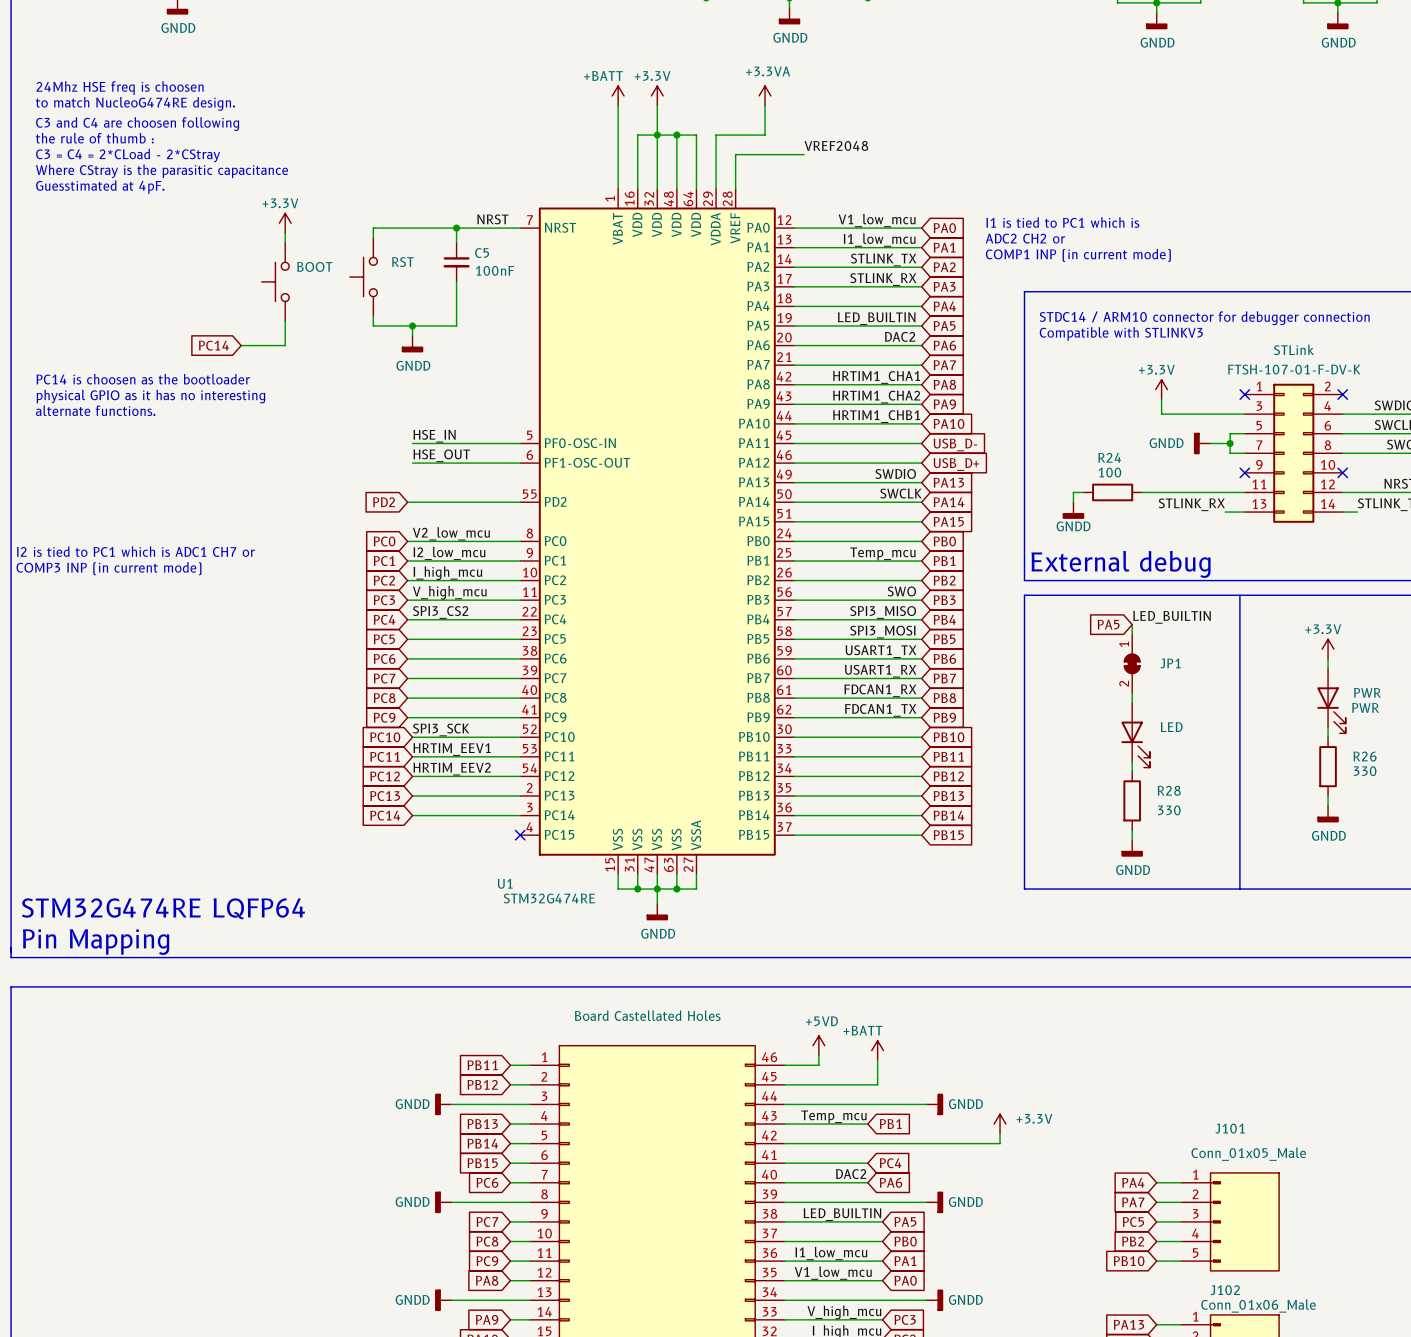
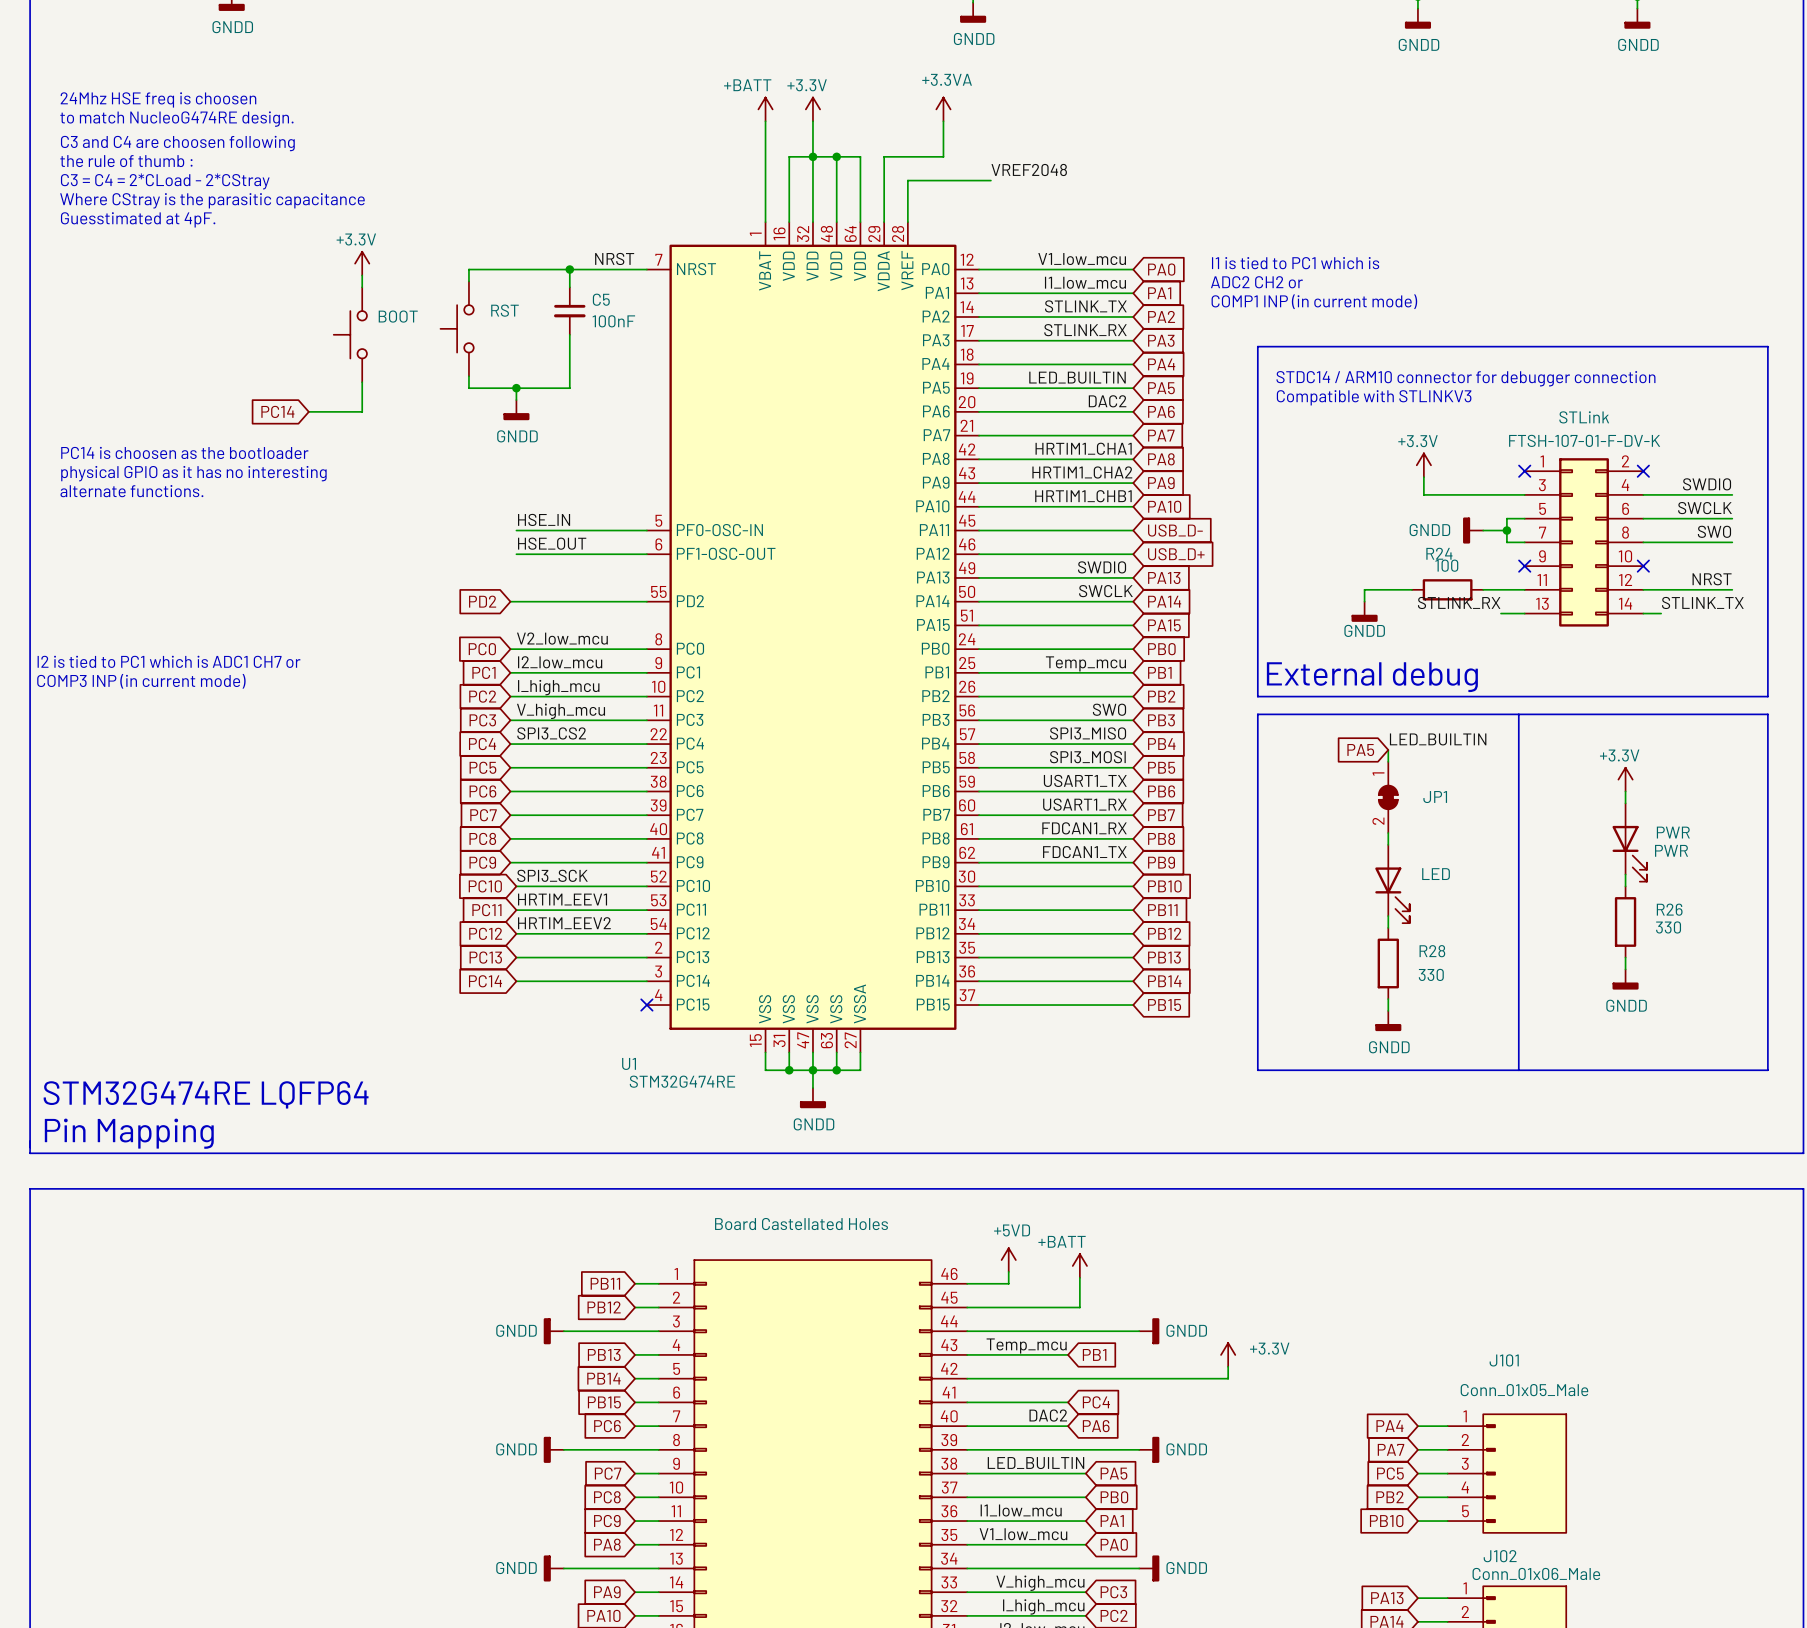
R24 name position: R24 (1109, 457) -> R24 (1439, 553)
wire: (1083, 492) (1073, 492) (1073, 502) -> none
R24 position: (1112, 492) -> (1447, 589)
wire: none -> (1400, 589) (1364, 589) (1364, 601)
wire: (1151, 492) (1210, 492) -> none
power symbol position: GNDD (1073, 510) -> GNDD (1364, 611)

